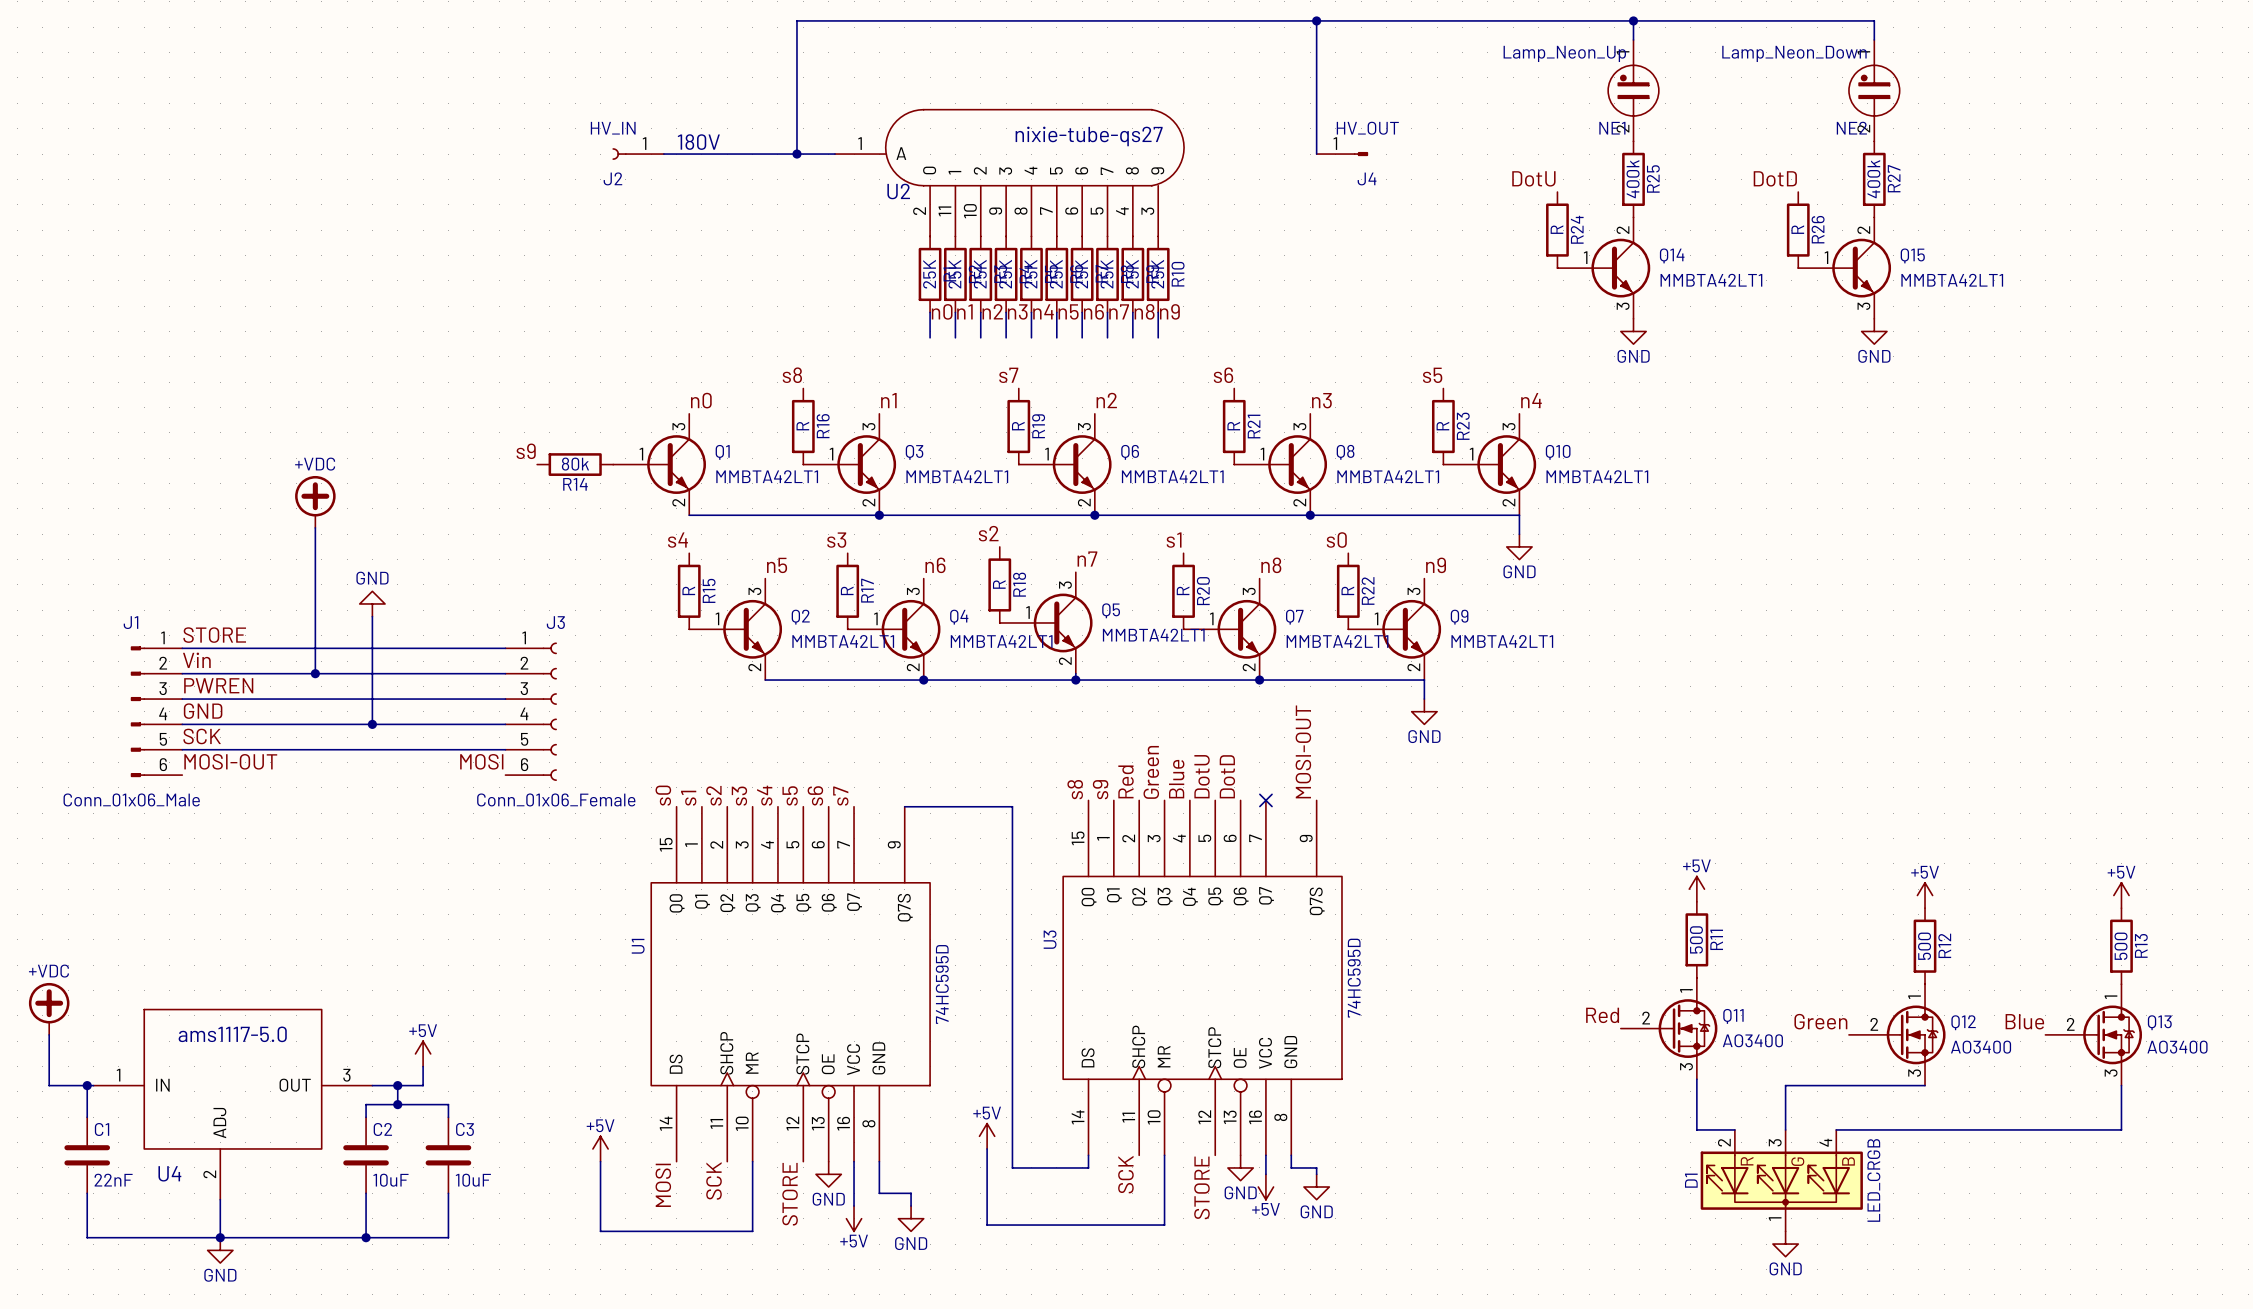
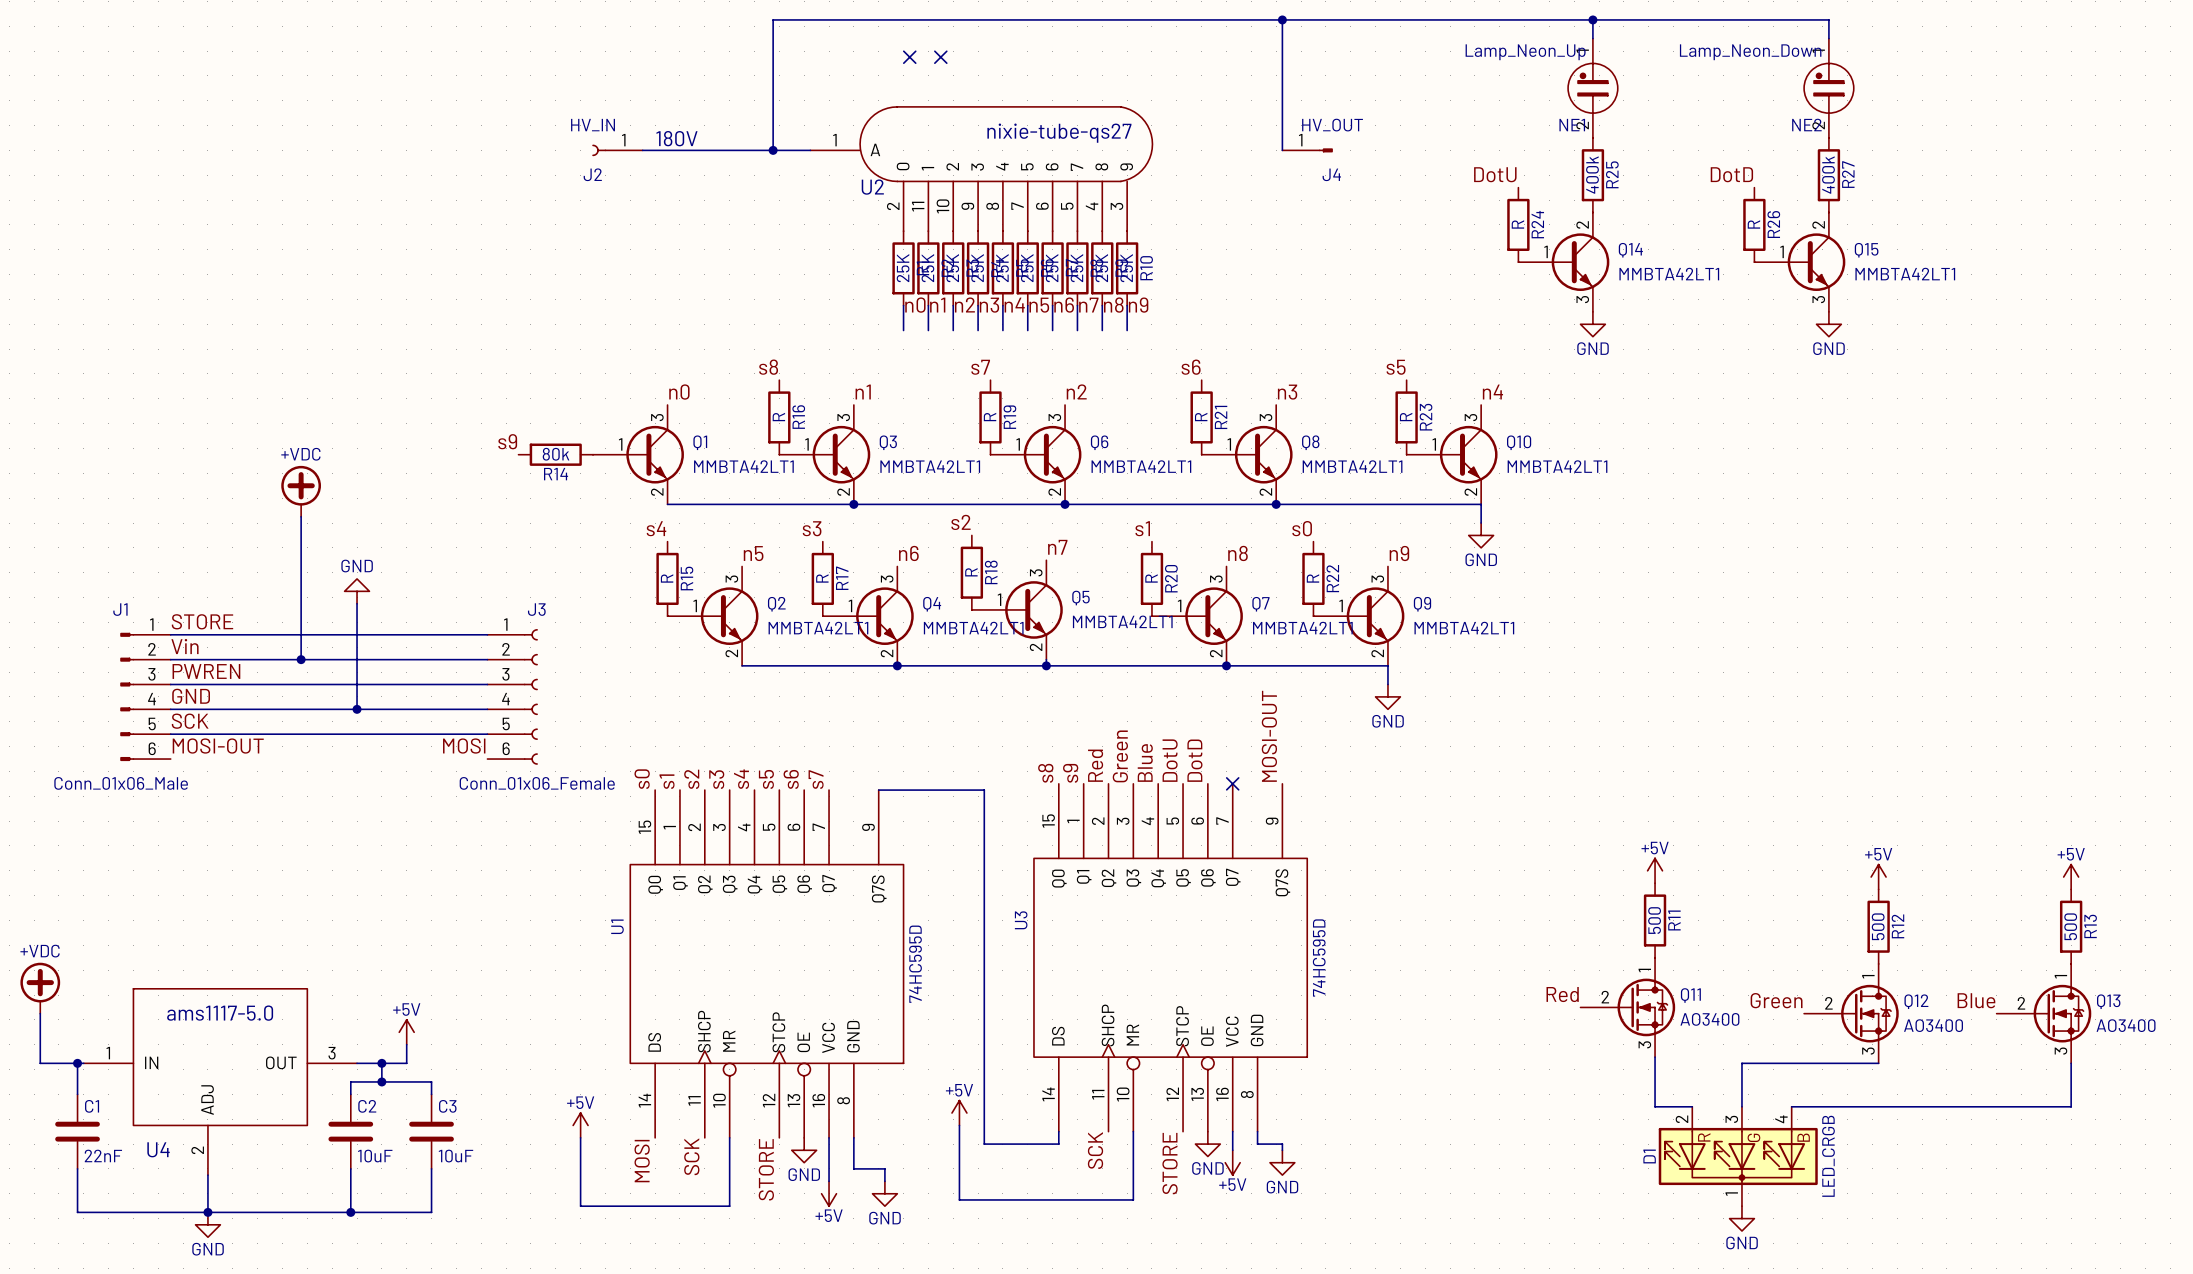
no-connect mark: none -> (909, 57)
no-connect mark: none -> (940, 57)

